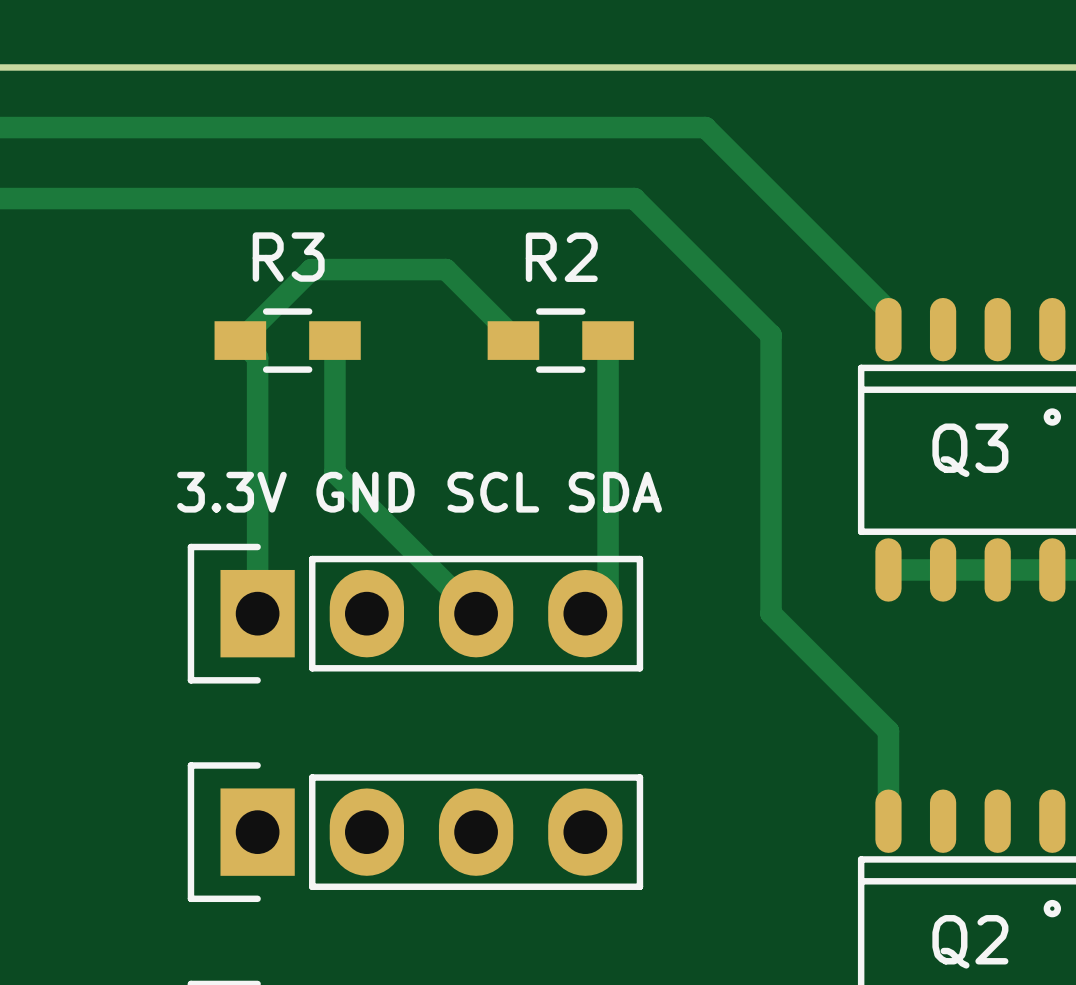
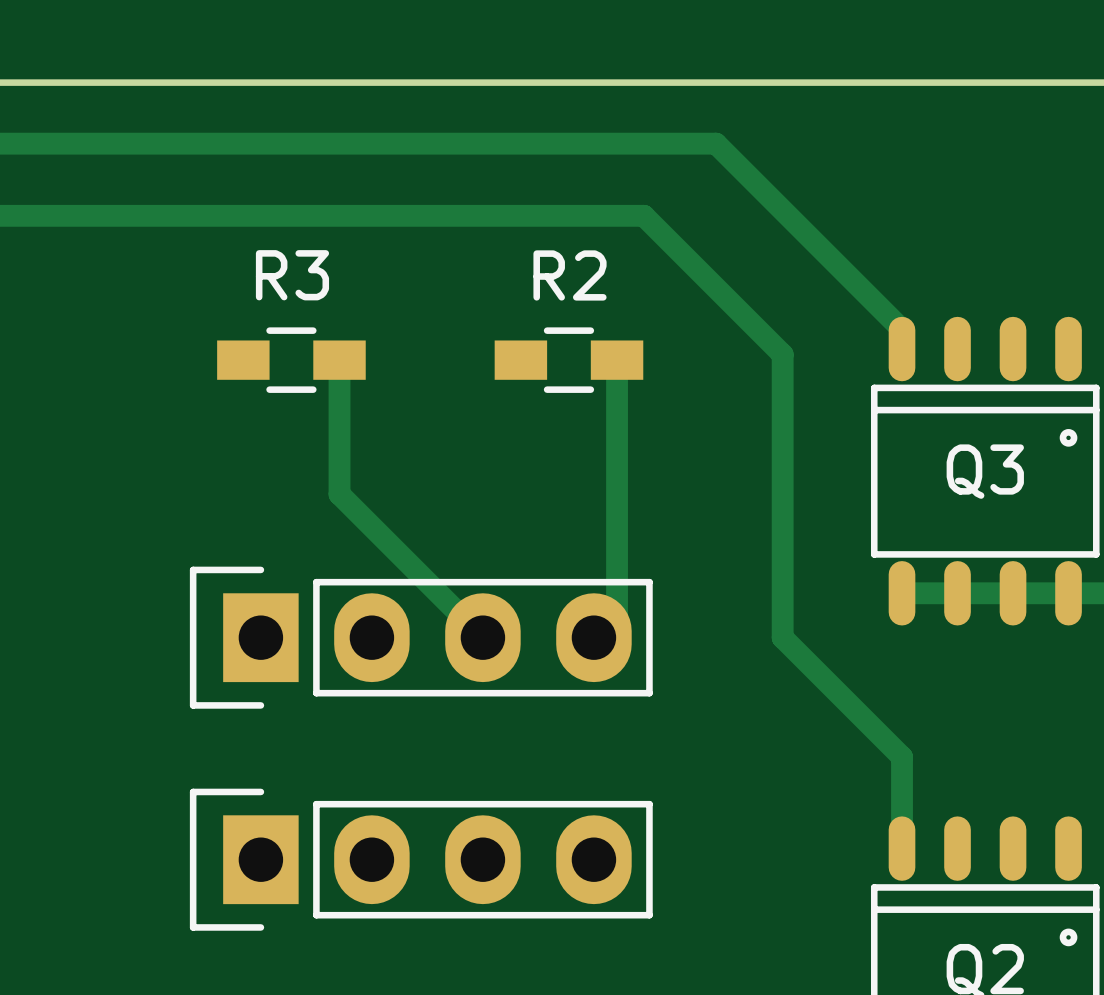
track: (513, 340) (513, 336) (446, 269) (311, 269) (240, 340) (257, 357) (257, 613) -> none
text: 3.3V GND SCL SDA (419, 492) -> none

